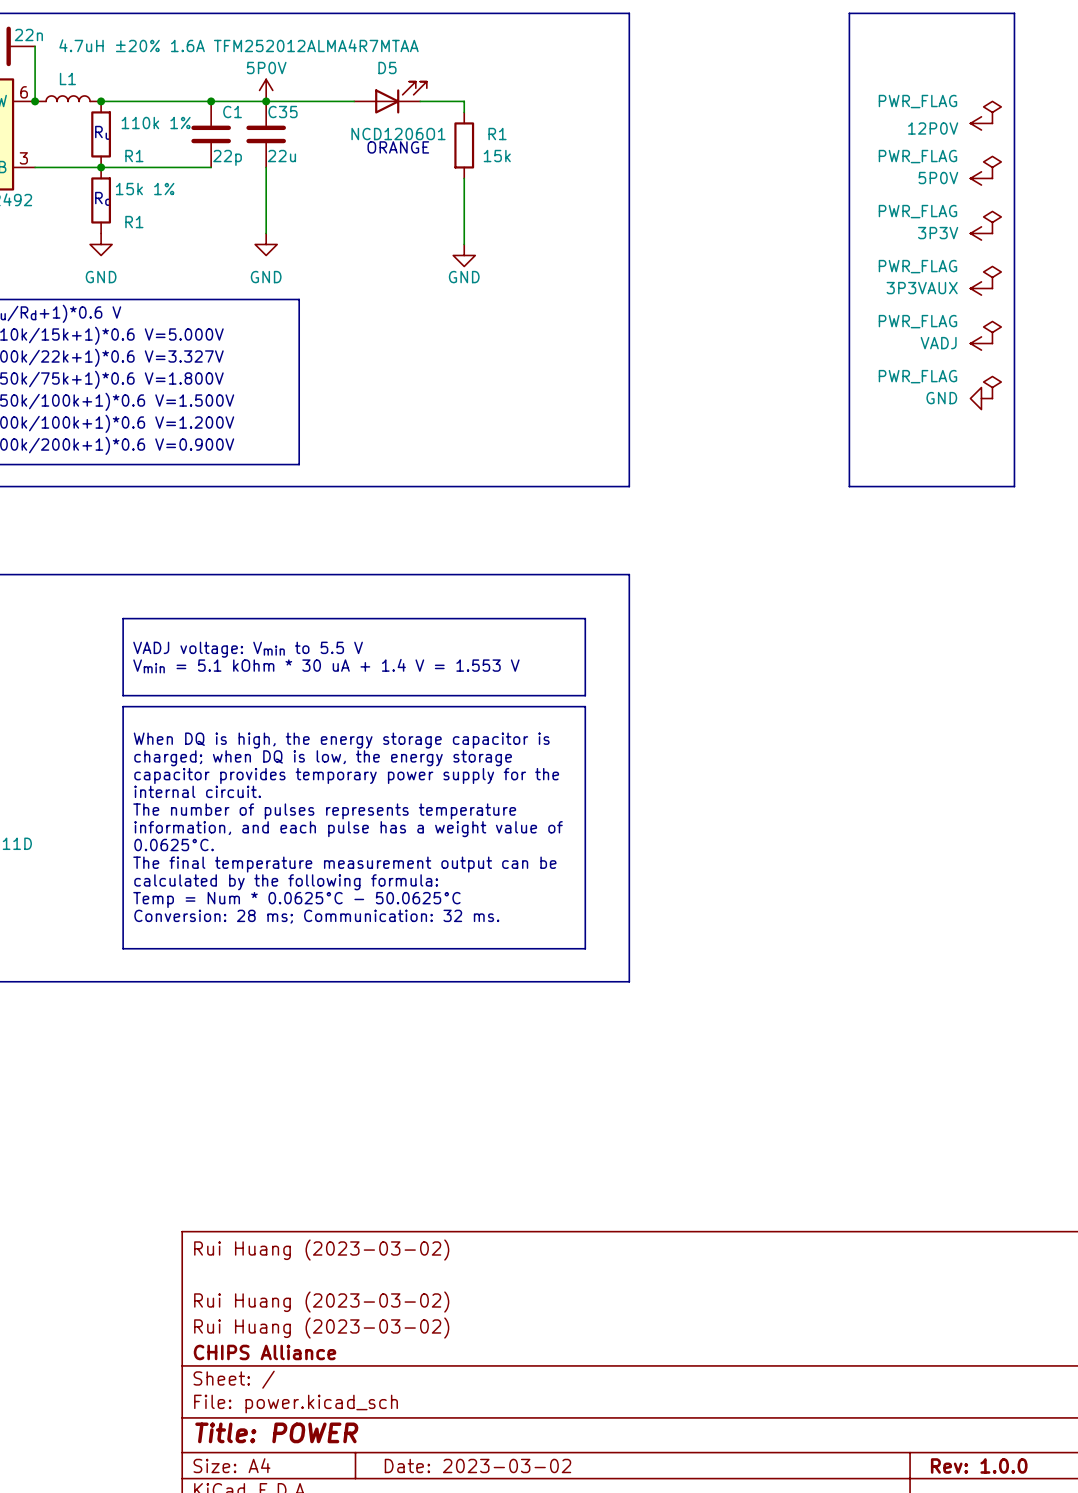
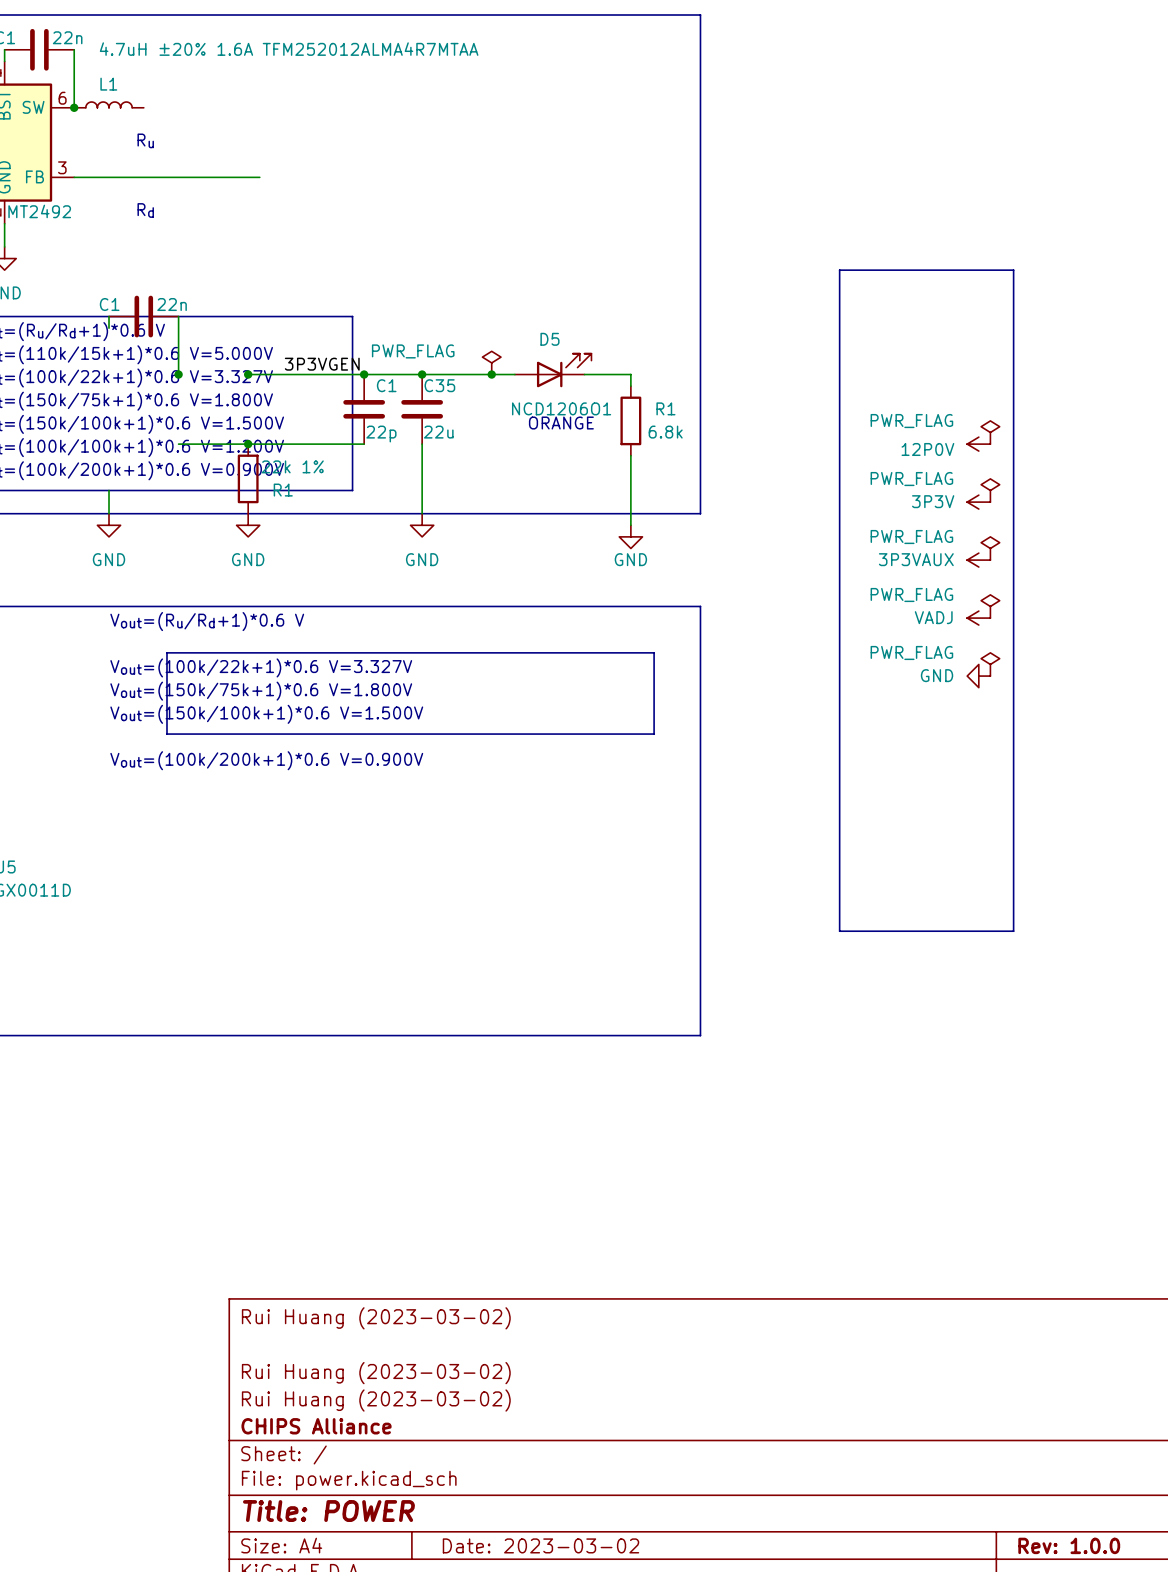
line: (849, 13) (849, 486) (1014, 486) (1014, 13) (849, 13) -> none
power symbol: 5P0V (266, 90) -> none
D5 position: (390, 97) -> (553, 370)
wire: (101, 101) (354, 101) -> none
junction: (101, 101) -> none
junction: (211, 101) -> none
junction: (266, 101) -> none
wire: (420, 101) (464, 101) (464, 112) -> none
power symbol: PWR_FLAG (992, 112) -> none
power symbol: 12P0V (981, 123) -> none
R1: 110k 1% (101, 134) -> none
C1: 22p (211, 134) -> none
C35 position: (266, 134) -> (422, 409)
R1: 15k (464, 145) -> none
text: ORANGE (398, 147) -> none
junction: (101, 167) -> none
wire: (266, 167) (266, 233) -> none
power symbol: PWR_FLAG (992, 167) -> none
wire: (464, 178) (464, 244) -> none
power symbol: 5P0V (981, 178) -> none
R1: 15k 1% (101, 200) -> none
power symbol: PWR_FLAG (992, 222) -> none
power symbol: 3P3V (981, 233) -> none
power symbol: GND (101, 244) -> none
power symbol: GND (266, 244) -> none
power symbol: GND (464, 255) -> none
line: none -> (839, 270) (839, 931) (1013, 931) (1013, 270) (839, 270)
power symbol: PWR_FLAG (992, 277) -> none
power symbol: 3P3VAUX (981, 288) -> none
wire: none -> (109, 316) (109, 328)
C1: none -> 22n (143, 316)
wire: none -> (178, 316) (178, 374)
power symbol: PWR_FLAG (992, 332) -> none
power symbol: none -> PWR_FLAG (491, 362)
power symbol: VADJ (981, 343) -> none
label: none -> 3P3VGEN (322, 364)
junction: none -> (178, 374)
wire: none -> (248, 374) (514, 374)
junction: none -> (248, 374)
junction: none -> (364, 374)
junction: none -> (422, 374)
junction: none -> (491, 374)
wire: none -> (584, 374) (630, 374) (630, 386)
C1: none -> 22p (364, 409)
power symbol: PWR_FLAG (992, 387) -> none
R1: none -> 6.8k (630, 420)
power symbol: GND (981, 398) -> none
text: none -> ORANGE (561, 423)
power symbol: none -> PWR_FLAG (990, 432)
wire: none -> (178, 444) (364, 444)
junction: none -> (248, 444)
wire: none -> (422, 444) (422, 513)
power symbol: none -> 12P0V (978, 444)
wire: none -> (630, 455) (630, 525)
R1: none -> 22k 1% (248, 478)
wire: none -> (109, 490) (109, 513)
power symbol: none -> PWR_FLAG (990, 490)
power symbol: none -> 3P3V (978, 502)
power symbol: none -> GND (109, 525)
power symbol: none -> GND (248, 525)
power symbol: none -> GND (422, 525)
power symbol: none -> GND (630, 536)
power symbol: none -> PWR_FLAG (990, 548)
power symbol: none -> 3P3VAUX (978, 560)
power symbol: none -> PWR_FLAG (990, 606)
power symbol: none -> VADJ (978, 618)
text: none -> Vout=(Ru/Rd+1)*0.6 V (207, 621)
power symbol: none -> PWR_FLAG (990, 664)
text: none -> Vout=(100k/22k+1)*0.6 V=3.327V (261, 667)
power symbol: none -> GND (978, 676)
text: VADJ voltage: Vmin to 5.5 V (248, 649) -> none
text: none -> Vout=(150k/75k+1)*0.6 V=1.800V (261, 691)
text: Vmin = 5.1 kOhm * 30 uA + 1.4 V = 1.553 V (326, 666) -> none
text: none -> Vout=(150k/100k+1)*0.6 V=1.500V (266, 714)
line: (123, 706) (585, 706) (585, 948) (123, 948) (123, 706) -> none
text: none -> Vout=(100k/200k+1)*0.6 V=0.900V (266, 760)
text: When DQ is high, the energy storage capacitor is (341, 740) -> none
text: charged; when DQ is low, the energy storage (323, 758) -> none
text: capacitor provides temporary power supply for the (346, 775) -> none
text: internal circuit. (197, 791) -> none
text: The number of pulses represents temperature (324, 811) -> none
text: information, and each pulse has a weight value of (348, 829) -> none
text: 0.0625°C. (174, 845) -> none
text: The final temperature measurement output can be (344, 864) -> none
text: calculated by the following formula: (286, 882) -> none
text: Temp = Num * 0.0625°C − 50.0625°C (296, 899) -> none
text: Conversion: 28 ms; Communication: 32 ms. (316, 916) -> none

